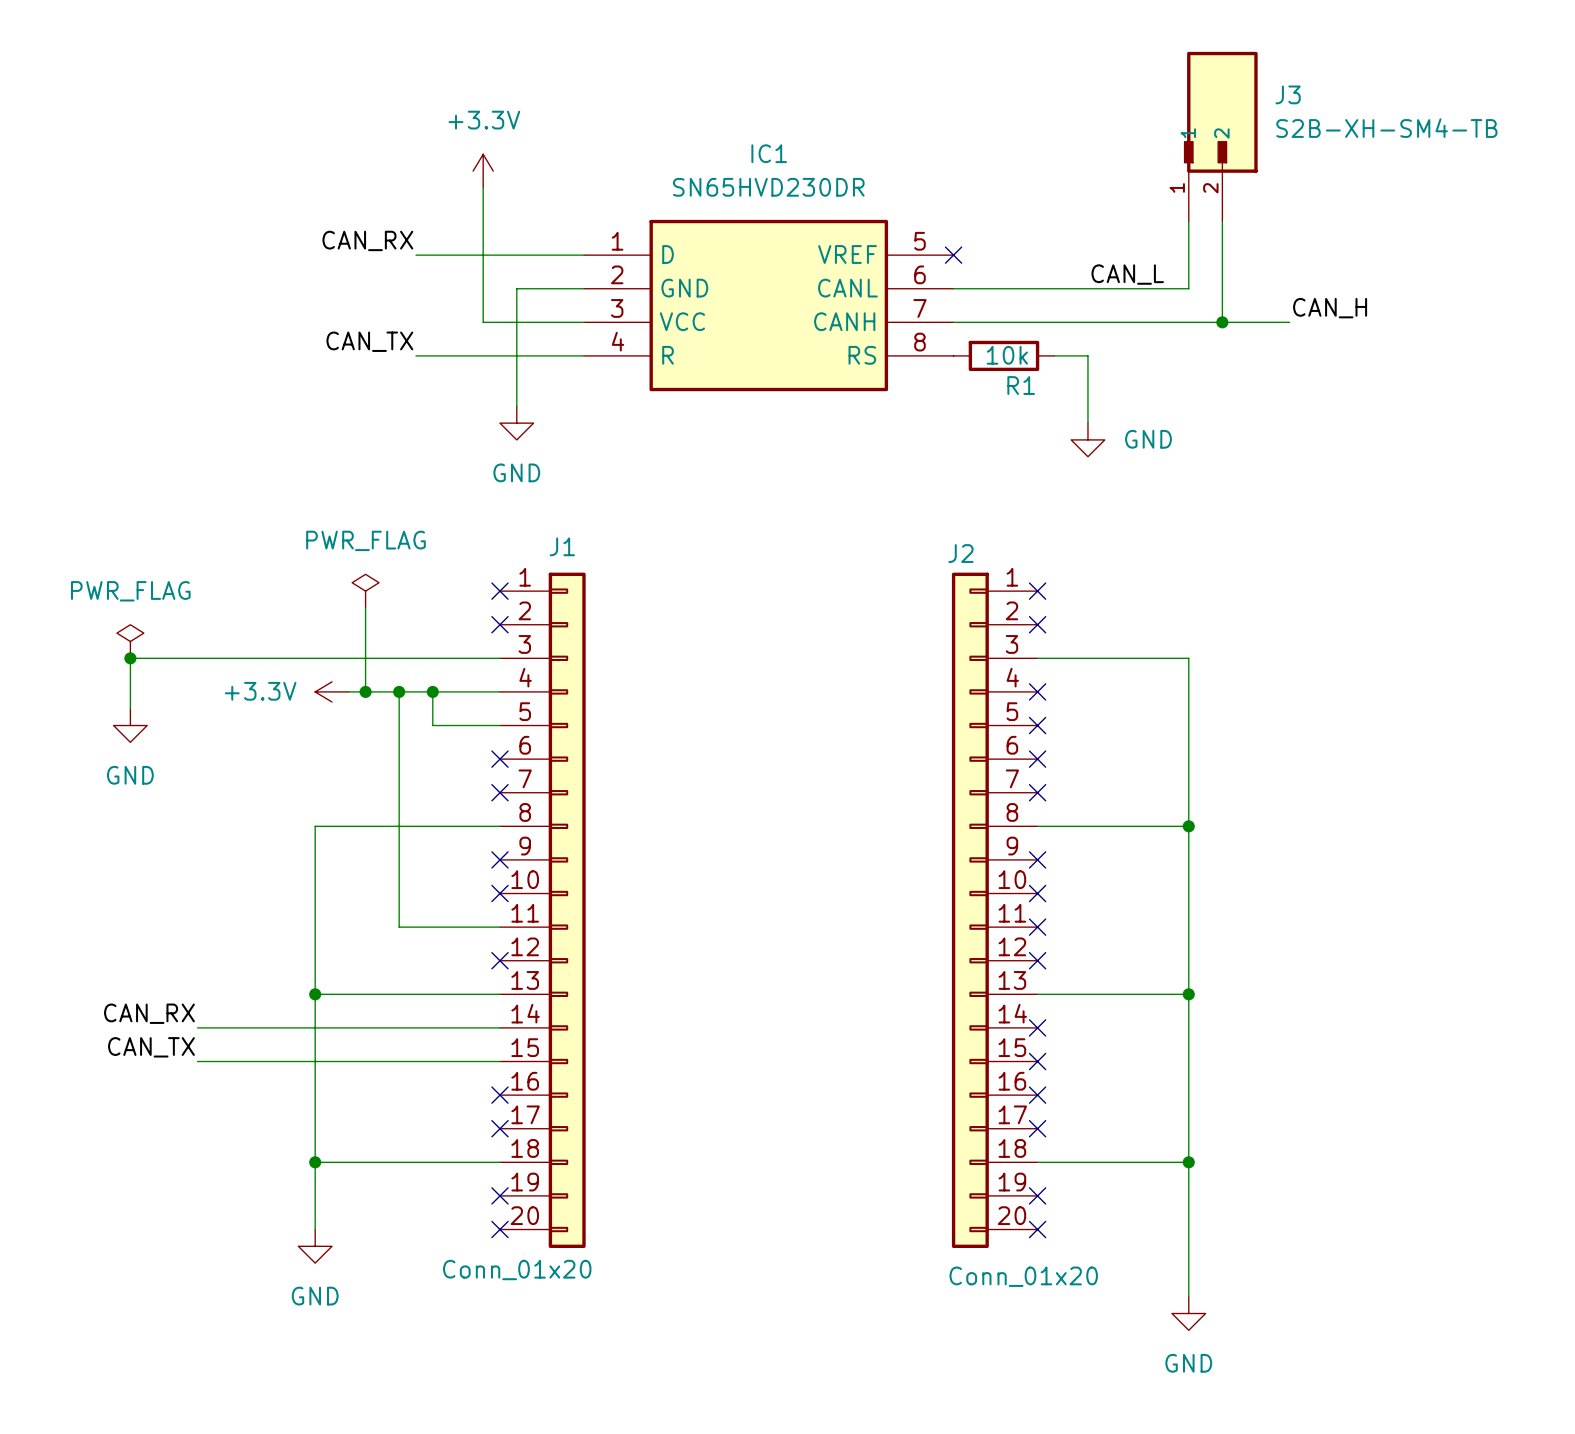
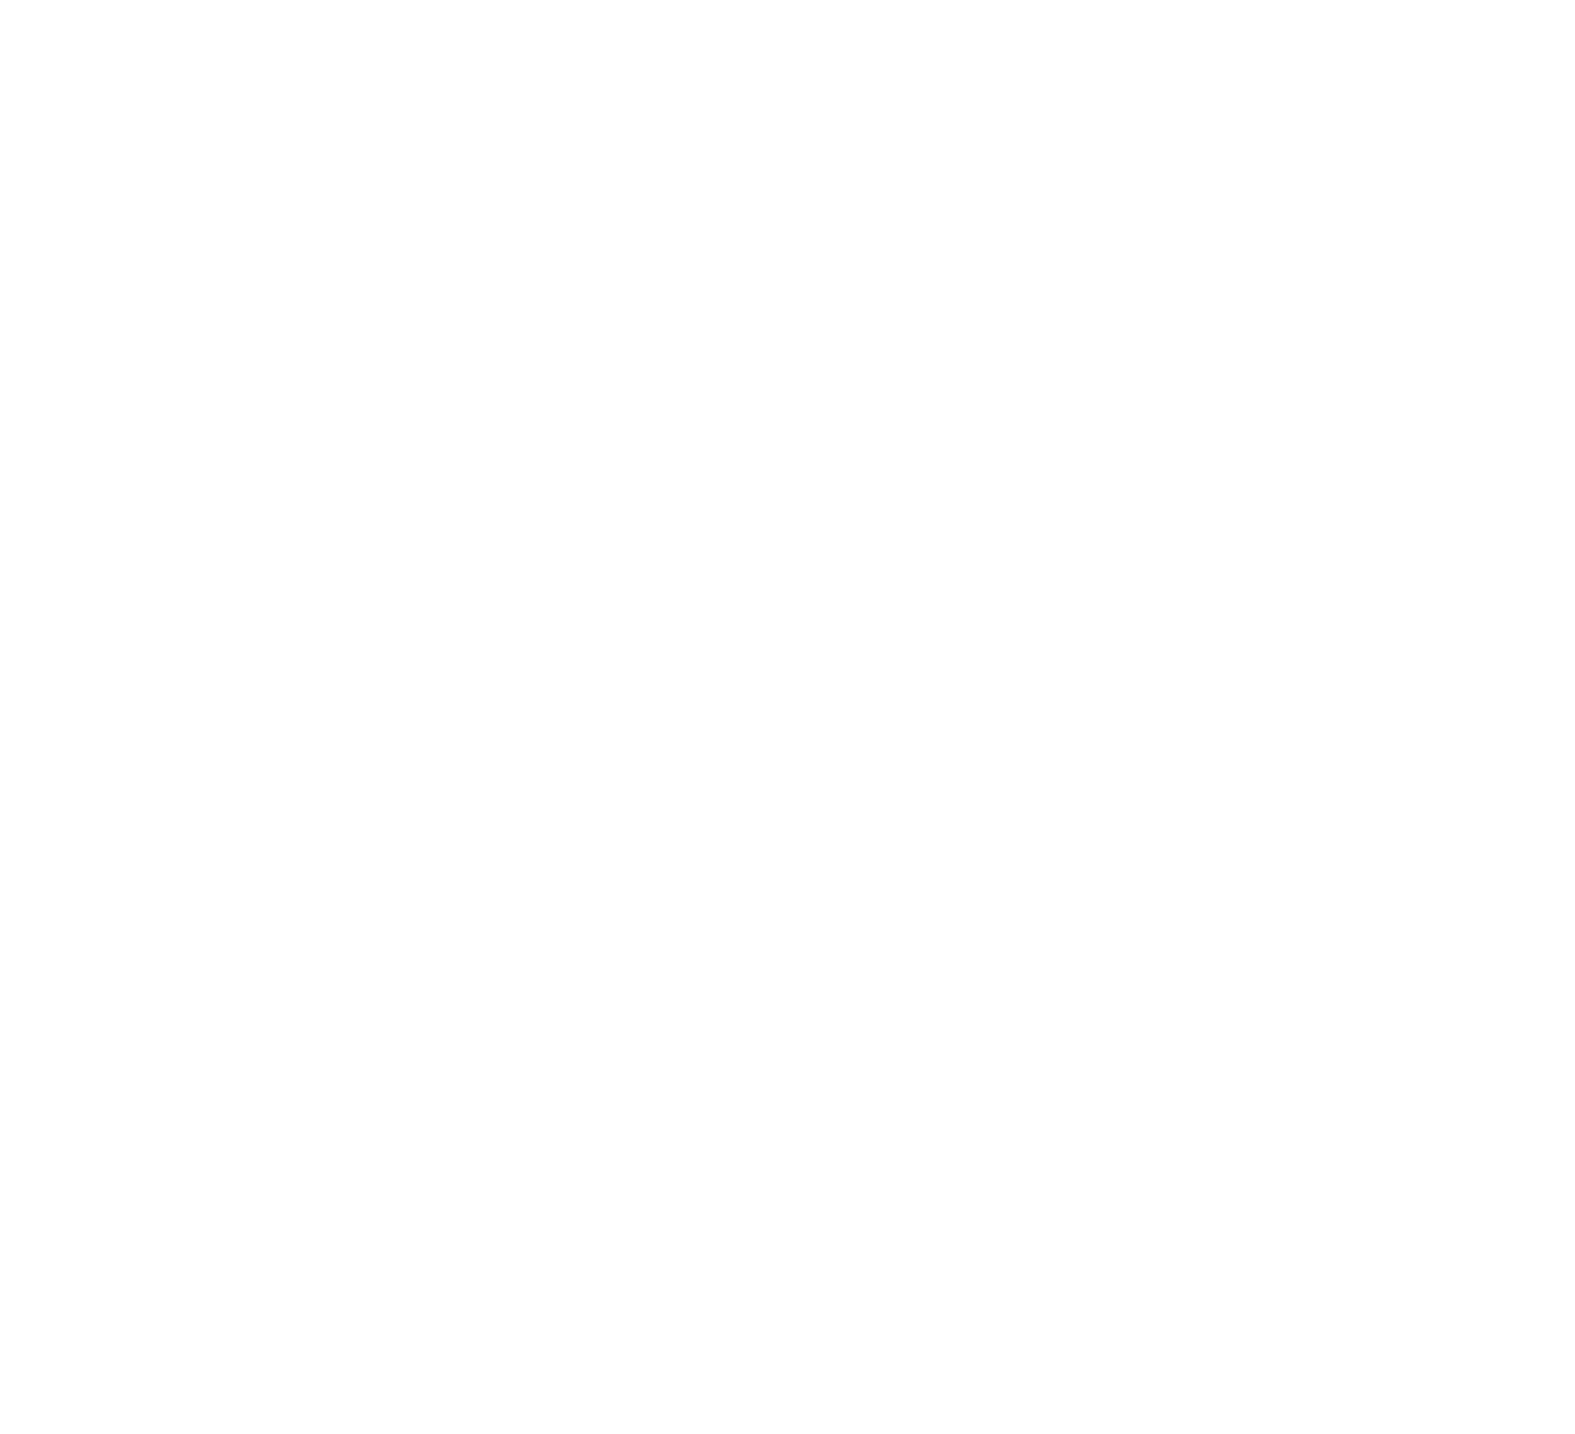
J3: S2B-XH-SM4-TB (1220, 136) -> none
power symbol: +3.3V (483, 171) -> none
wire: (483, 187) (483, 322) (583, 322) -> none
wire: (1188, 221) (1188, 288) (953, 288) -> none
wire: (1222, 221) (1222, 322) -> none
label: CAN_RX (367, 240) -> none
wire: (415, 255) (583, 255) -> none
no-connect mark: (953, 255) -> none
label: CAN_L (1127, 274) -> none
wire: (583, 288) (516, 288) (516, 406) -> none
IC1: SN65HVD230DR (768, 305) -> none
label: CAN_H (1330, 308) -> none
wire: (953, 322) (1289, 322) -> none
junction: (1222, 322) -> none
label: CAN_TX (369, 341) -> none
wire: (415, 355) (583, 355) -> none
R1: 10k (1003, 355) -> none
wire: (1054, 355) (1087, 355) (1087, 423) -> none
power symbol: GND (516, 423) -> none
power symbol: GND (1087, 439) -> none
power symbol: PWR_FLAG (365, 591) -> none
no-connect mark: (499, 591) -> none
no-connect mark: (1037, 591) -> none
wire: (365, 607) (365, 691) -> none
no-connect mark: (499, 624) -> none
no-connect mark: (1037, 624) -> none
power symbol: PWR_FLAG (130, 641) -> none
junction: (130, 658) -> none
wire: (499, 658) (130, 658) (130, 708) -> none
wire: (1037, 658) (1188, 658) (1188, 1296) -> none
power symbol: +3.3V (331, 691) -> none
wire: (348, 691) (499, 691) -> none
junction: (365, 691) -> none
wire: (399, 691) (399, 927) (499, 927) -> none
junction: (399, 691) -> none
wire: (432, 691) (432, 725) (499, 725) -> none
junction: (432, 691) -> none
no-connect mark: (1037, 691) -> none
power symbol: GND (130, 725) -> none
no-connect mark: (1037, 725) -> none
no-connect mark: (499, 759) -> none
no-connect mark: (1037, 759) -> none
no-connect mark: (499, 792) -> none
no-connect mark: (1037, 792) -> none
wire: (499, 826) (315, 826) (315, 1229) -> none
wire: (1037, 826) (1188, 826) -> none
junction: (1188, 826) -> none
no-connect mark: (499, 859) -> none
no-connect mark: (1037, 859) -> none
no-connect mark: (499, 893) -> none
no-connect mark: (1037, 893) -> none
J1: Conn_01x20 (542, 910) -> none
J2: Conn_01x20 (994, 910) -> none
no-connect mark: (1037, 927) -> none
no-connect mark: (499, 960) -> none
no-connect mark: (1037, 960) -> none
wire: (315, 994) (499, 994) -> none
junction: (315, 994) -> none
wire: (1037, 994) (1188, 994) -> none
junction: (1188, 994) -> none
label: CAN_RX (149, 1013) -> none
wire: (197, 1027) (499, 1027) -> none
no-connect mark: (1037, 1027) -> none
label: CAN_TX (151, 1047) -> none
wire: (197, 1061) (499, 1061) -> none
no-connect mark: (1037, 1061) -> none
no-connect mark: (499, 1095) -> none
no-connect mark: (1037, 1095) -> none
no-connect mark: (499, 1128) -> none
no-connect mark: (1037, 1128) -> none
wire: (315, 1162) (499, 1162) -> none
junction: (315, 1162) -> none
wire: (1037, 1162) (1188, 1162) -> none
junction: (1188, 1162) -> none
no-connect mark: (499, 1195) -> none
no-connect mark: (1037, 1195) -> none
no-connect mark: (499, 1229) -> none
no-connect mark: (1037, 1229) -> none
power symbol: GND (315, 1246) -> none
power symbol: GND (1188, 1313) -> none

